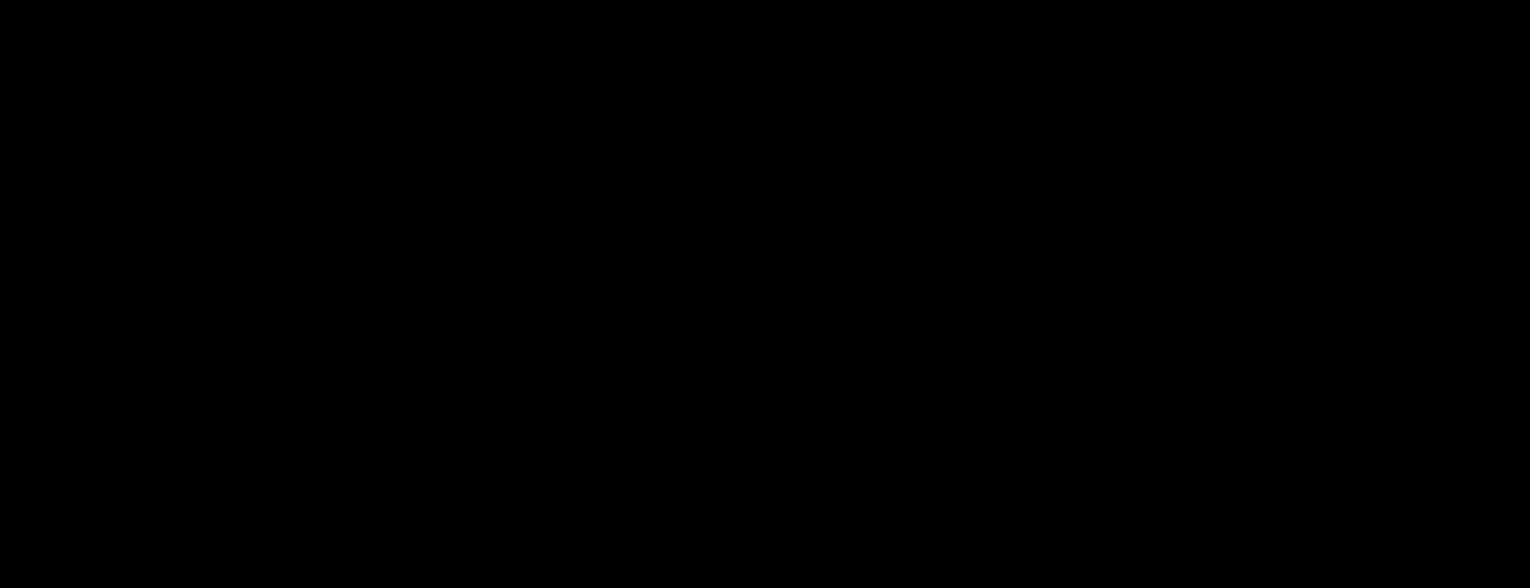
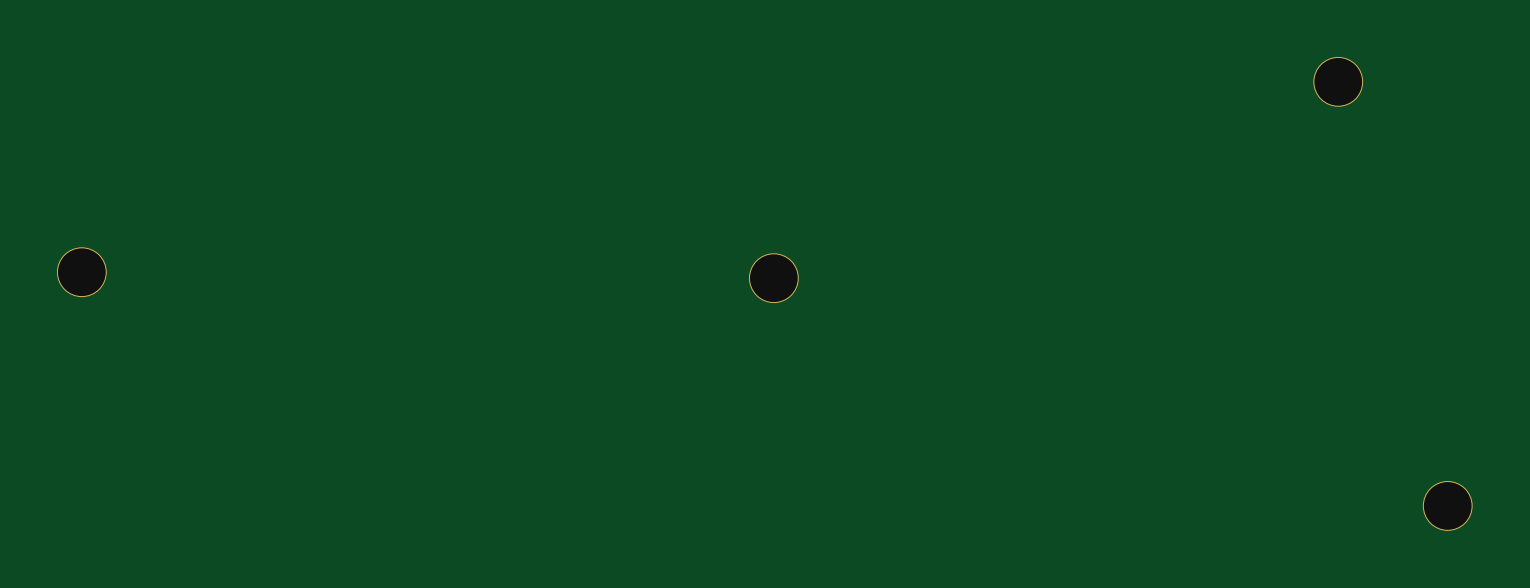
part: none -> (1338, 81)
part: none -> (81, 272)
part: none -> (773, 278)
part: none -> (1447, 505)

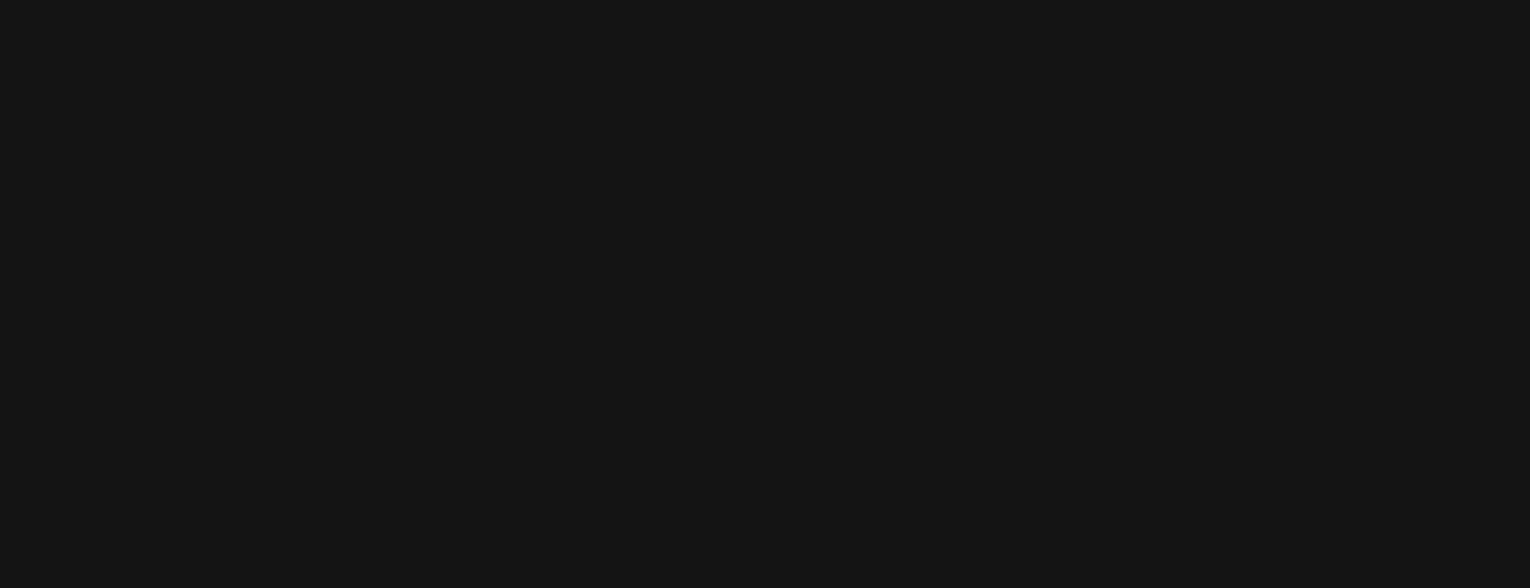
part: (1338, 81) -> none
part: (81, 272) -> none
part: (773, 278) -> none
part: (1447, 505) -> none

